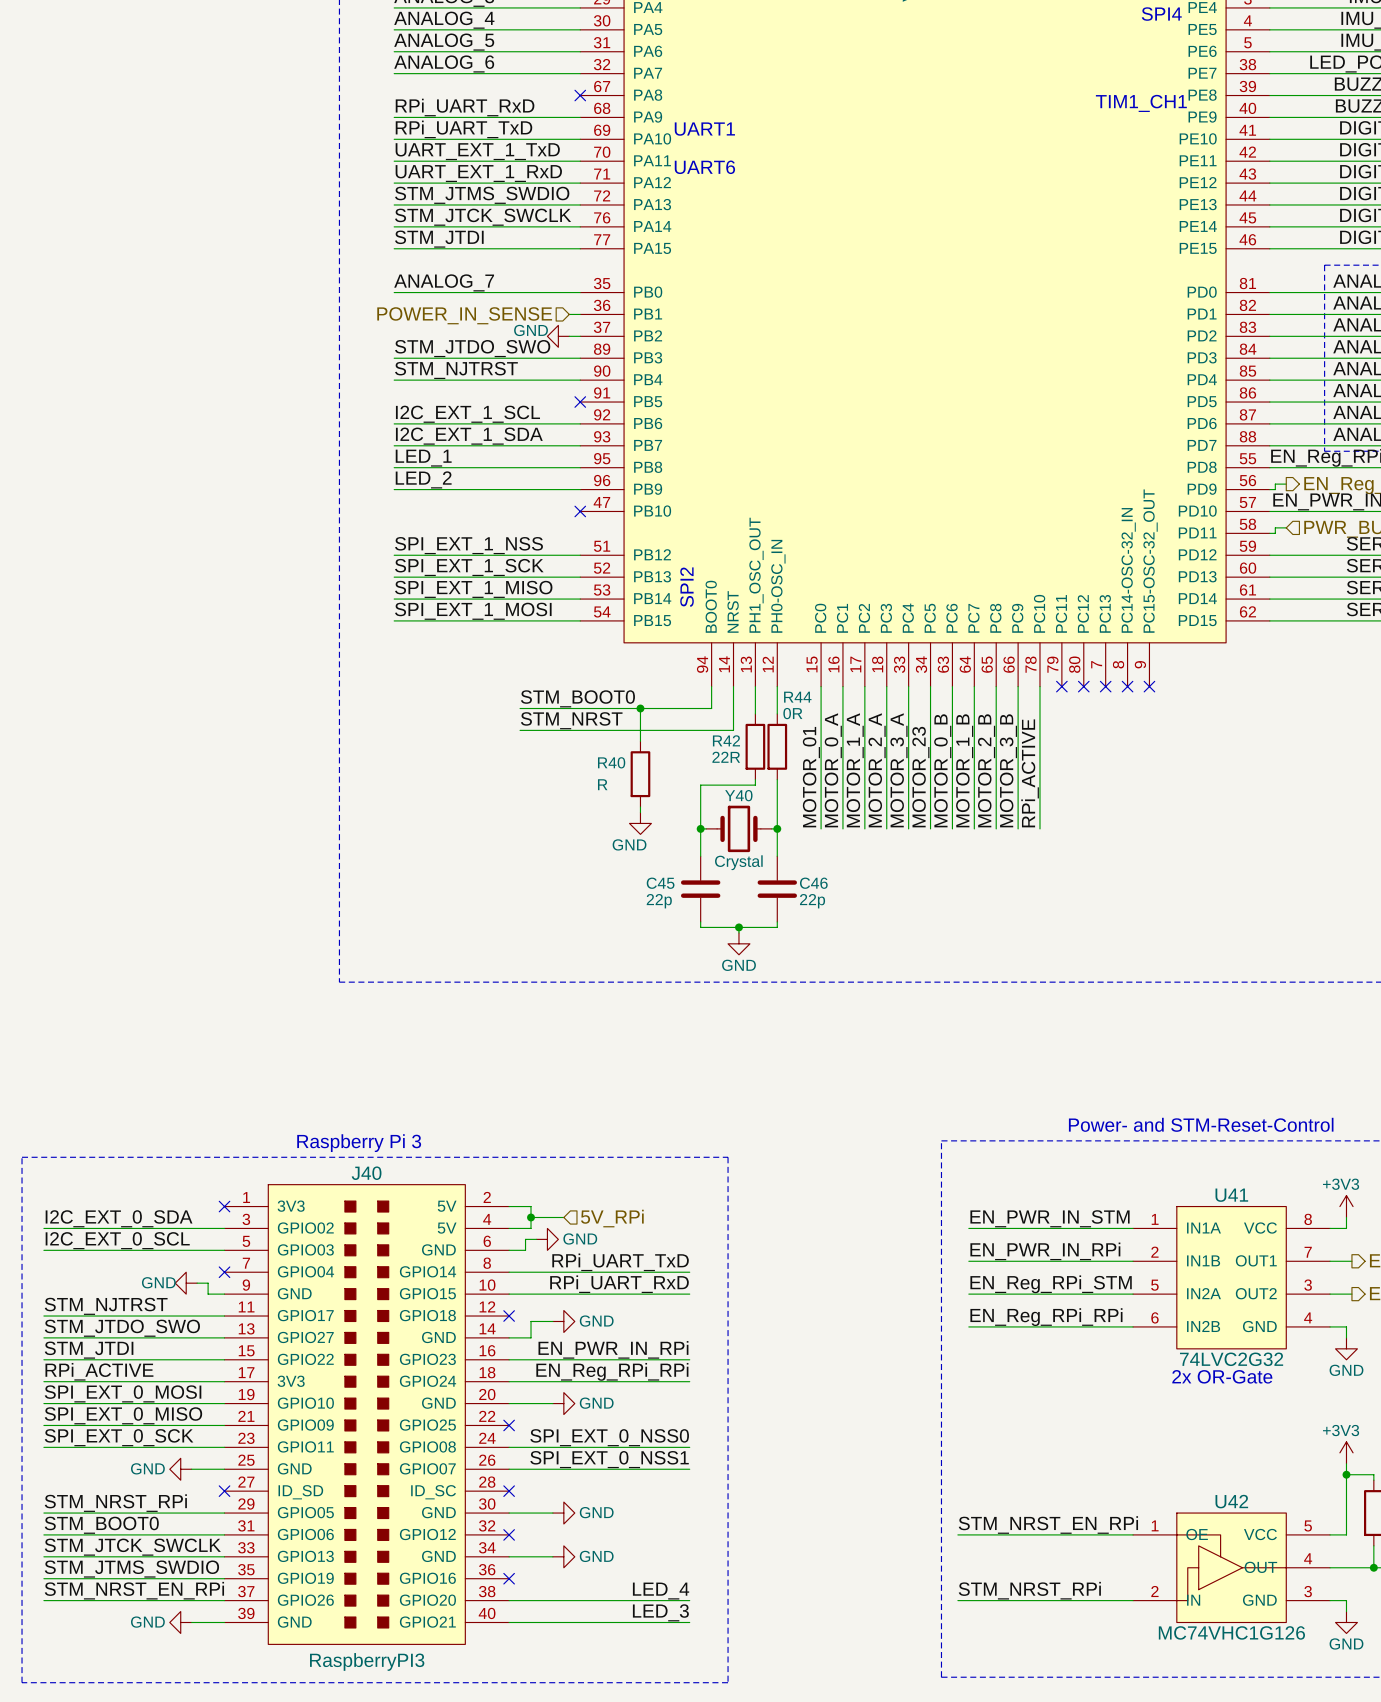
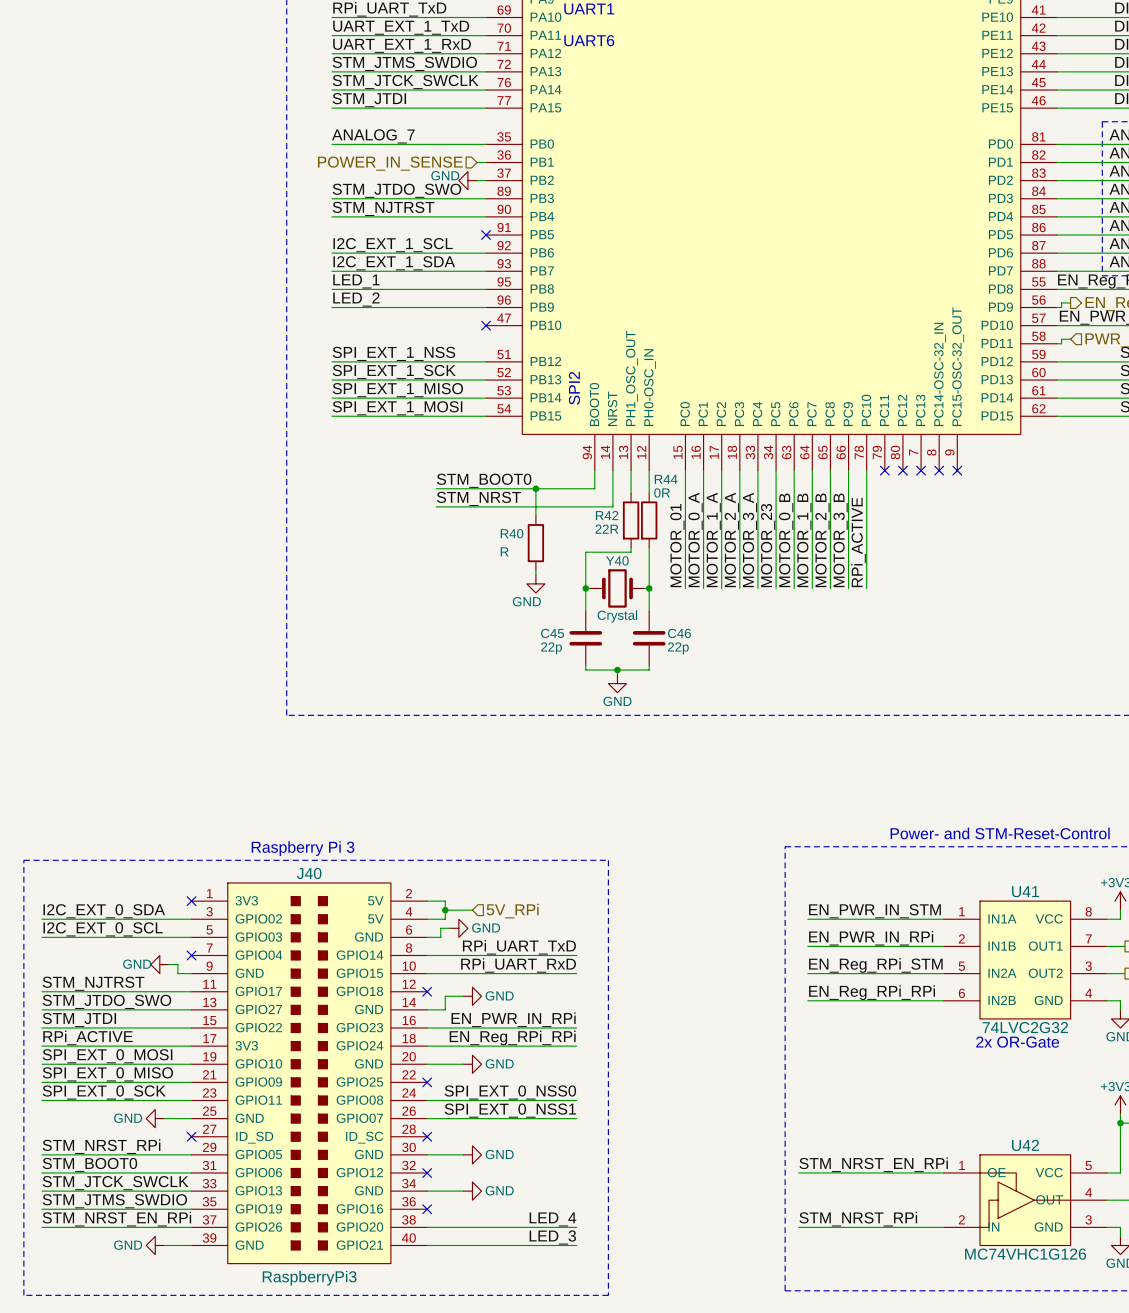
J40 value: RaspberryPI3 (367, 1661) -> RaspberryPi3 (309, 1278)

